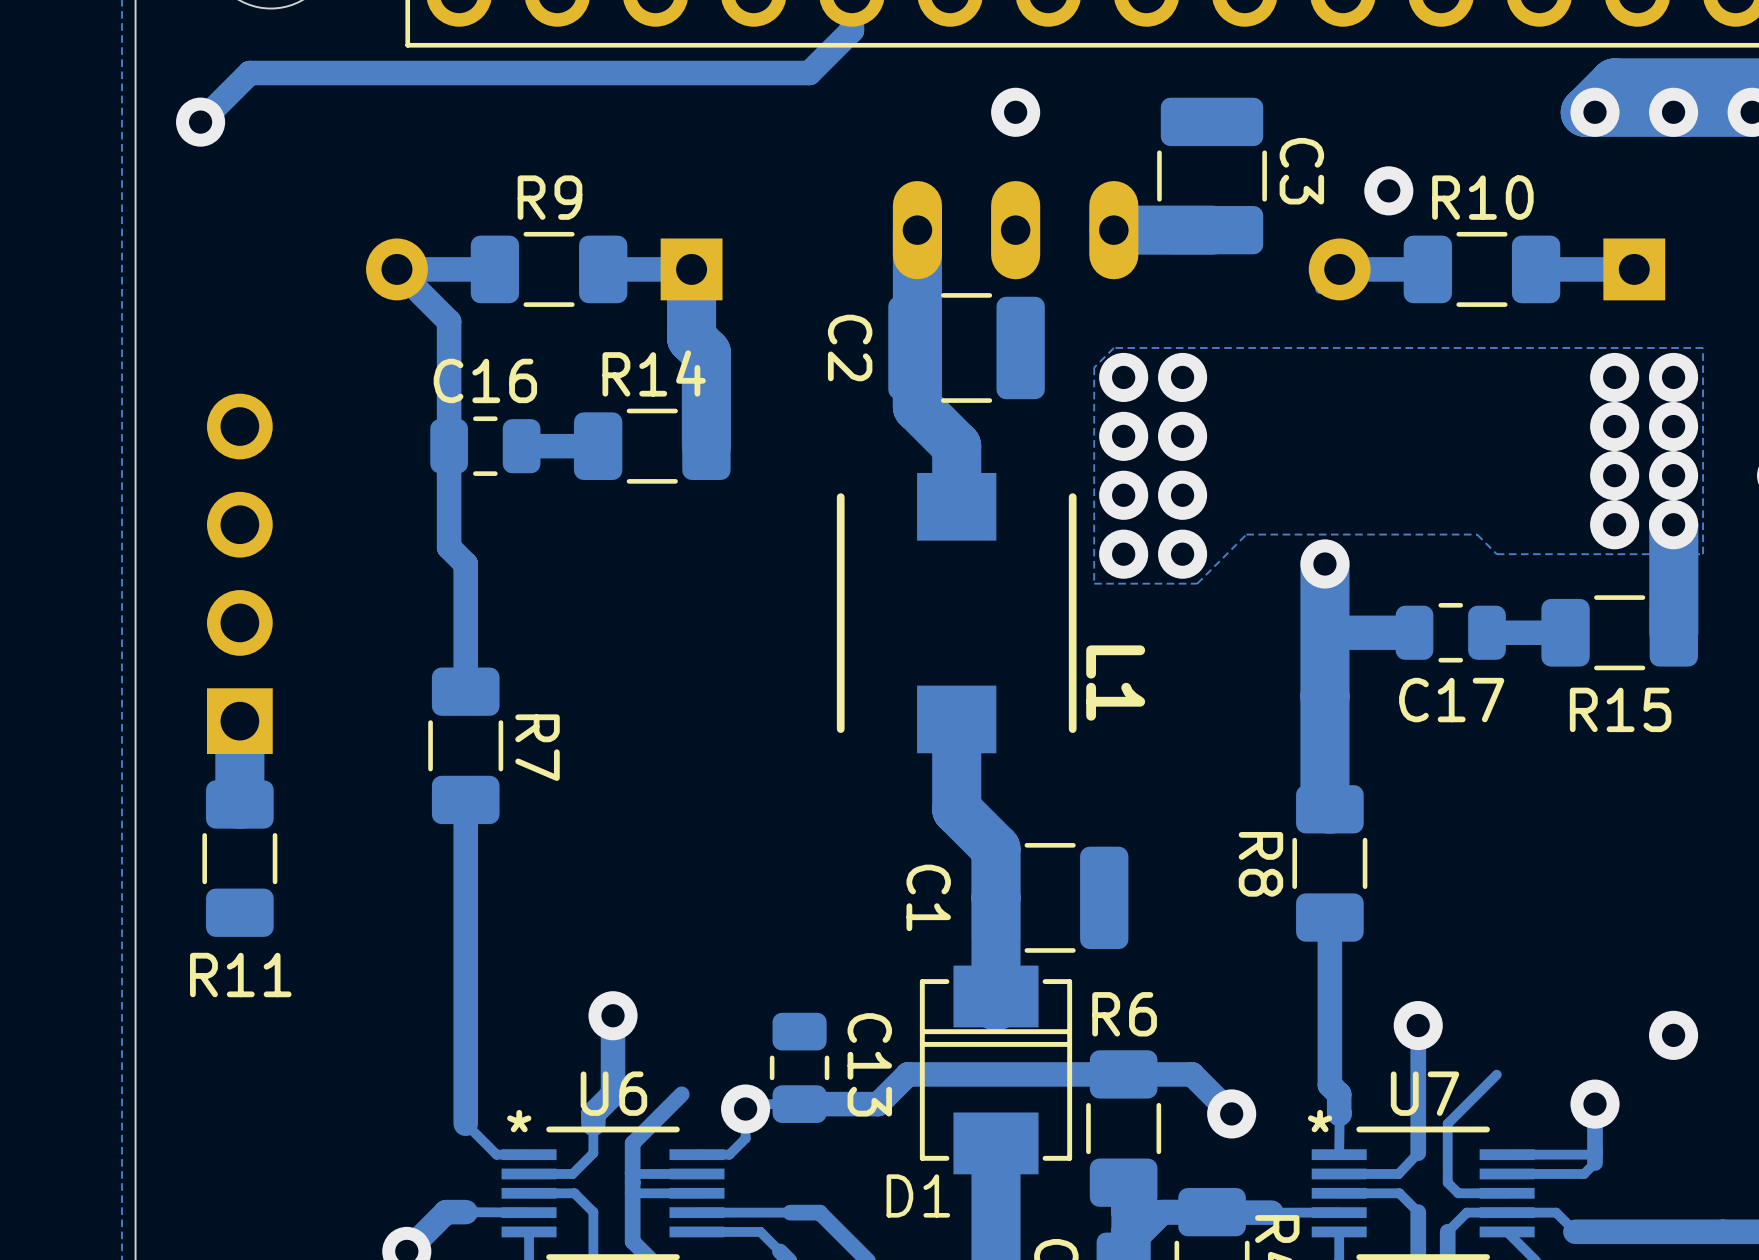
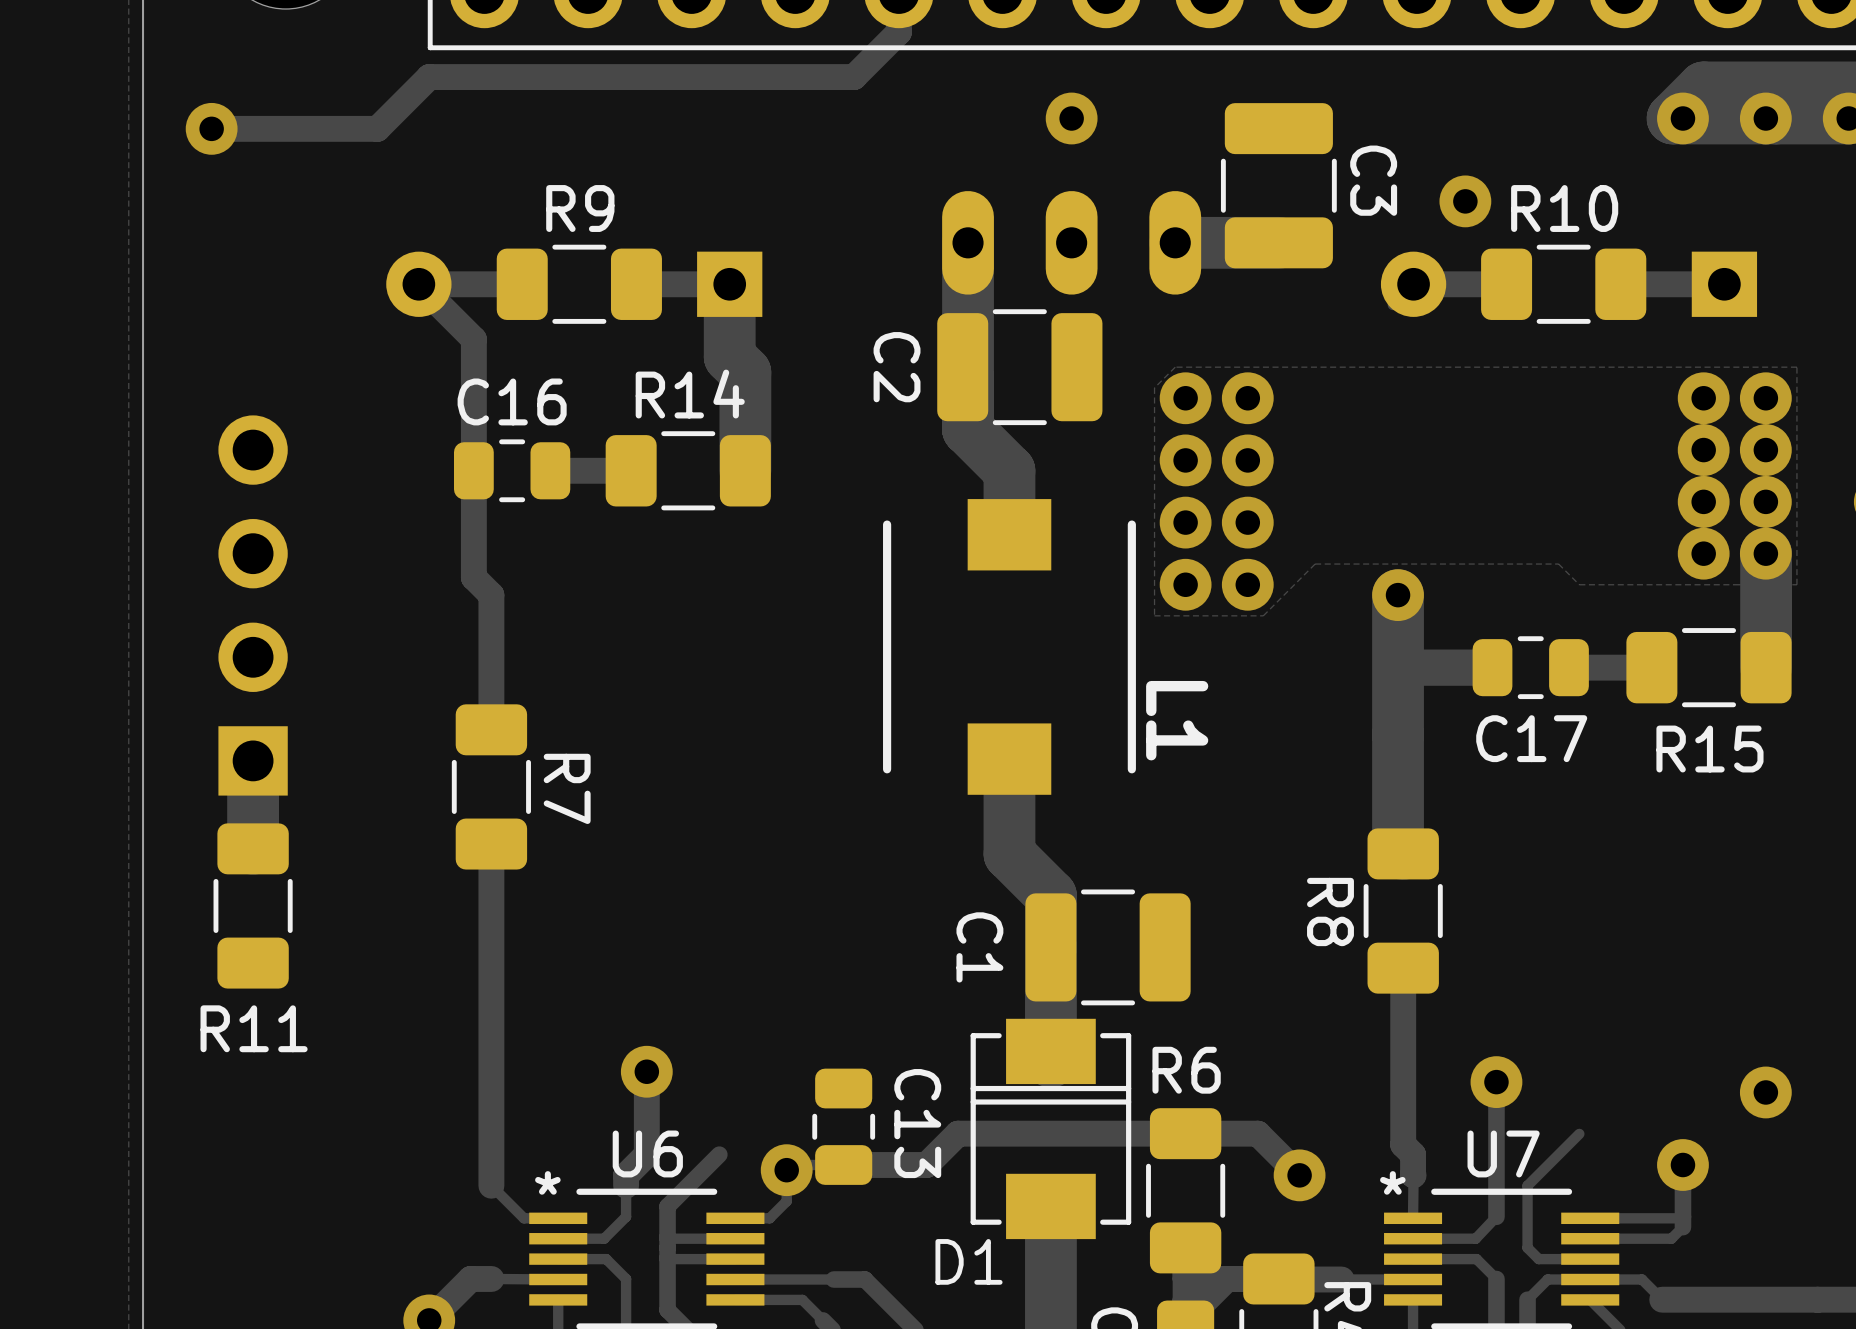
track: (406, 73) (249, 73) (200, 122) -> (429, 77) (377, 128) (211, 128)

